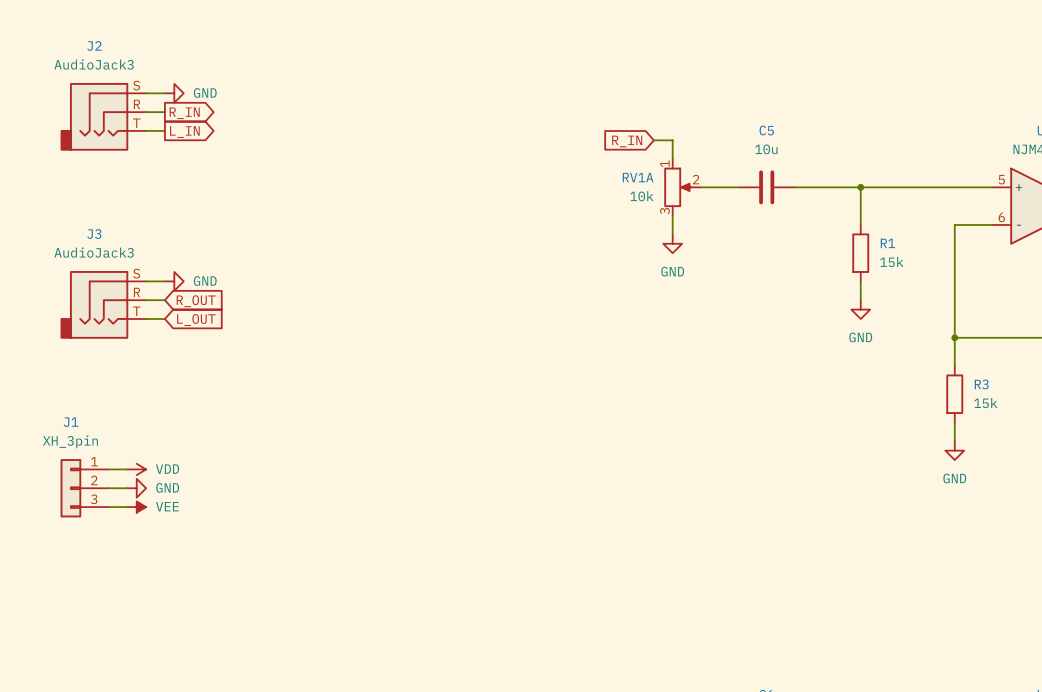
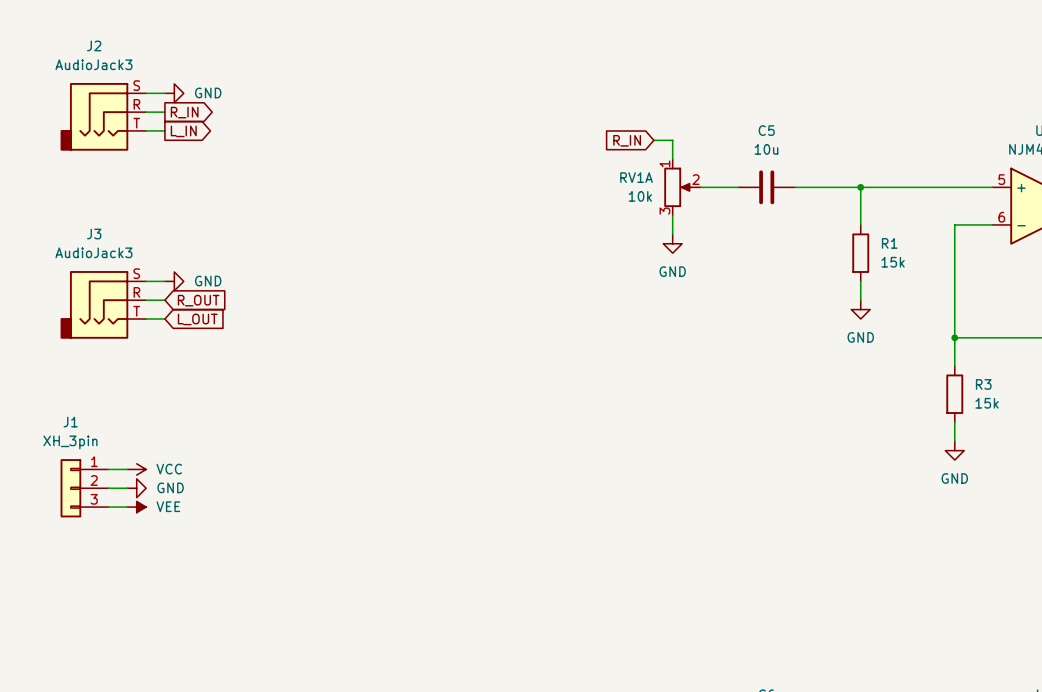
power symbol: VDD (136, 469) -> VCC (136, 469)

